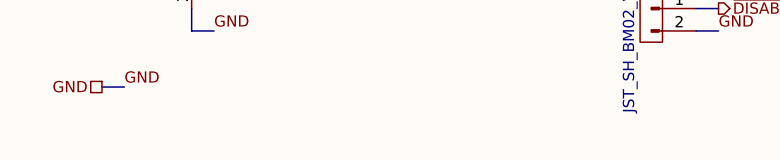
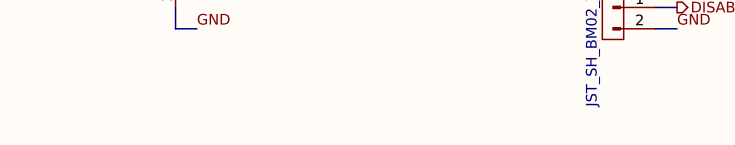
label: GND (141, 77) -> none
hierarchical label: GND (70, 86) -> none
wire: (101, 87) (124, 87) -> none

